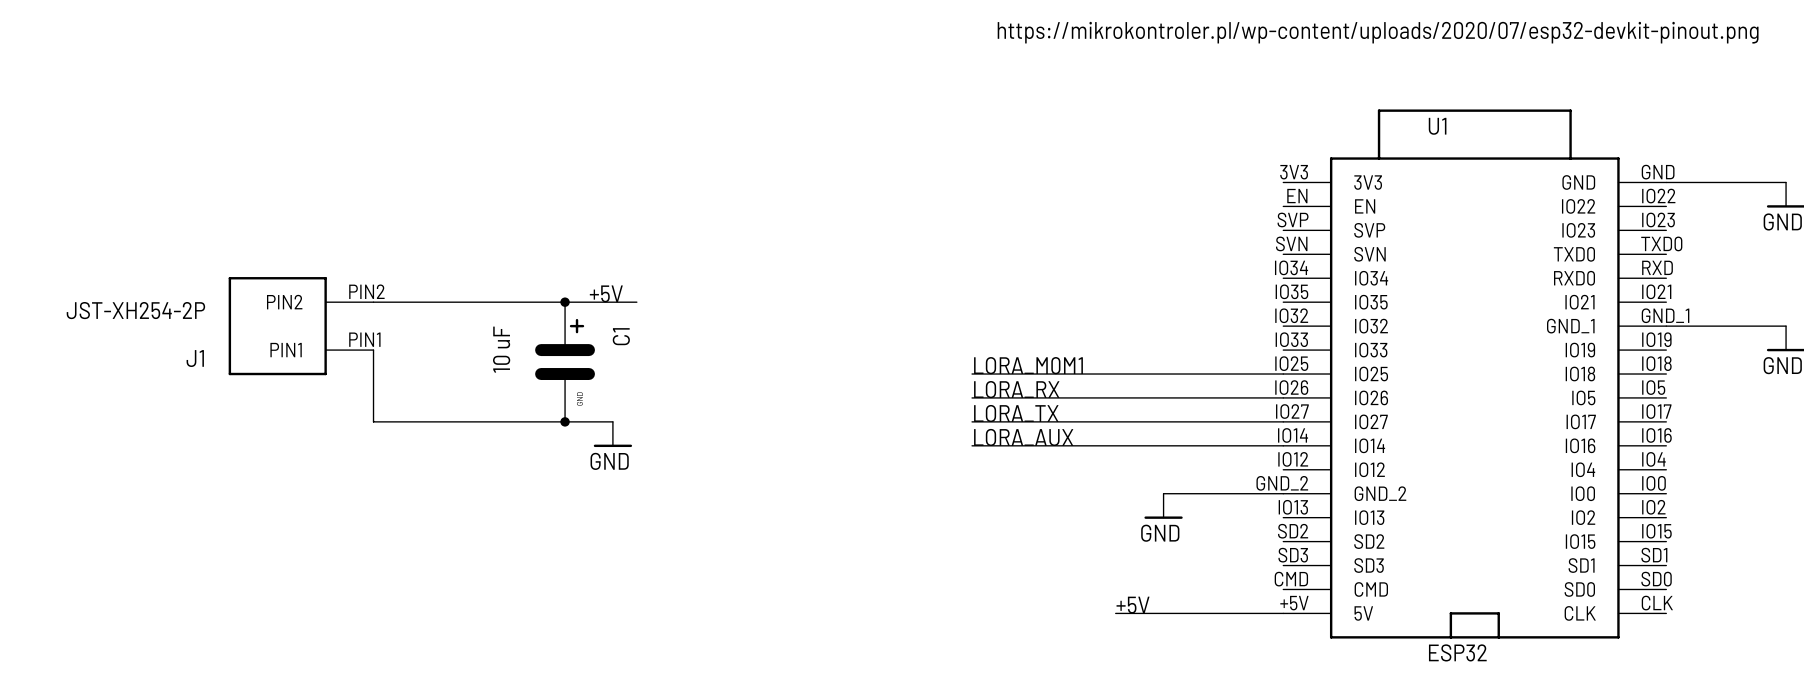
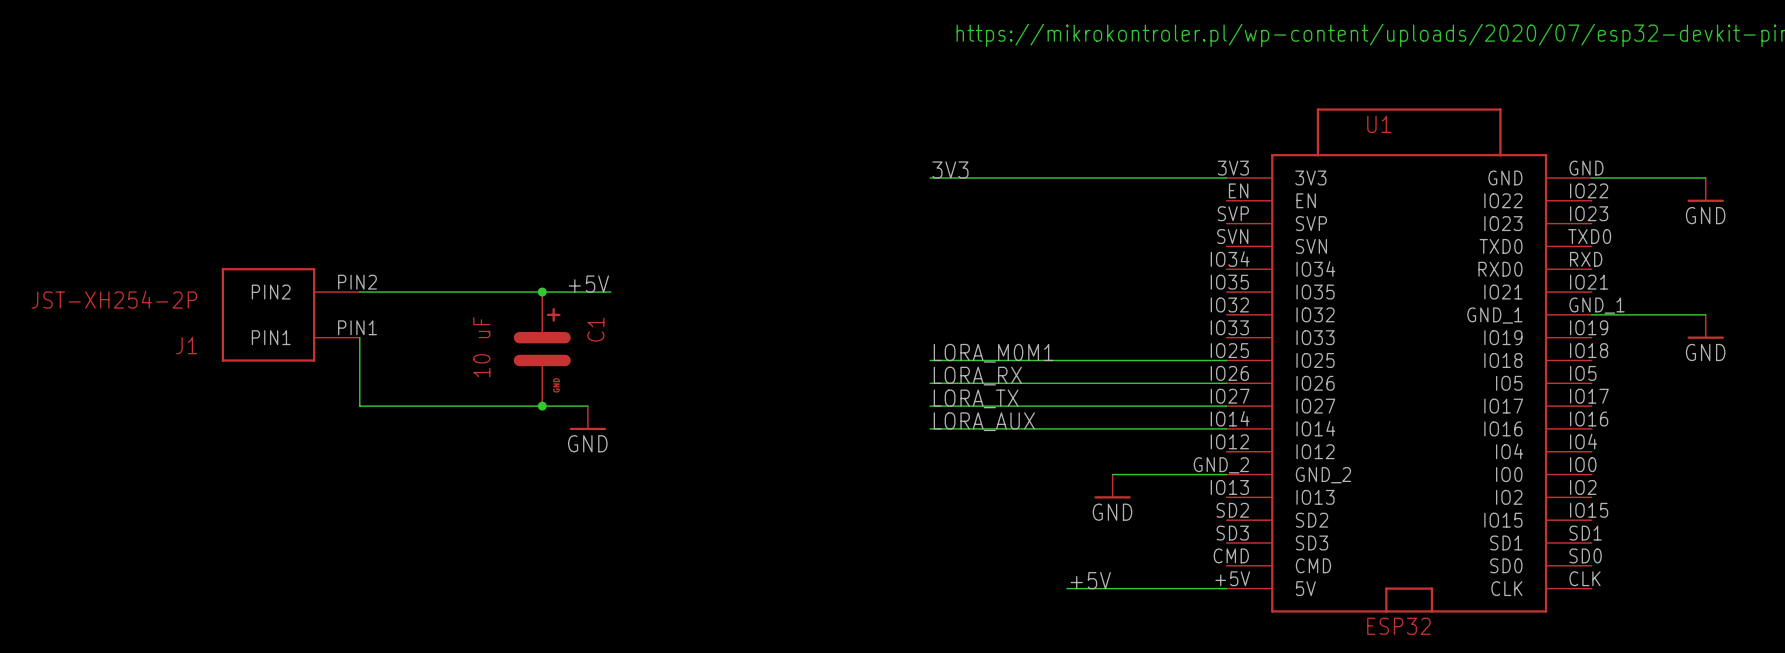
label: none -> 3V3 (950, 169)
wire: none -> (930, 177) (1226, 177)

